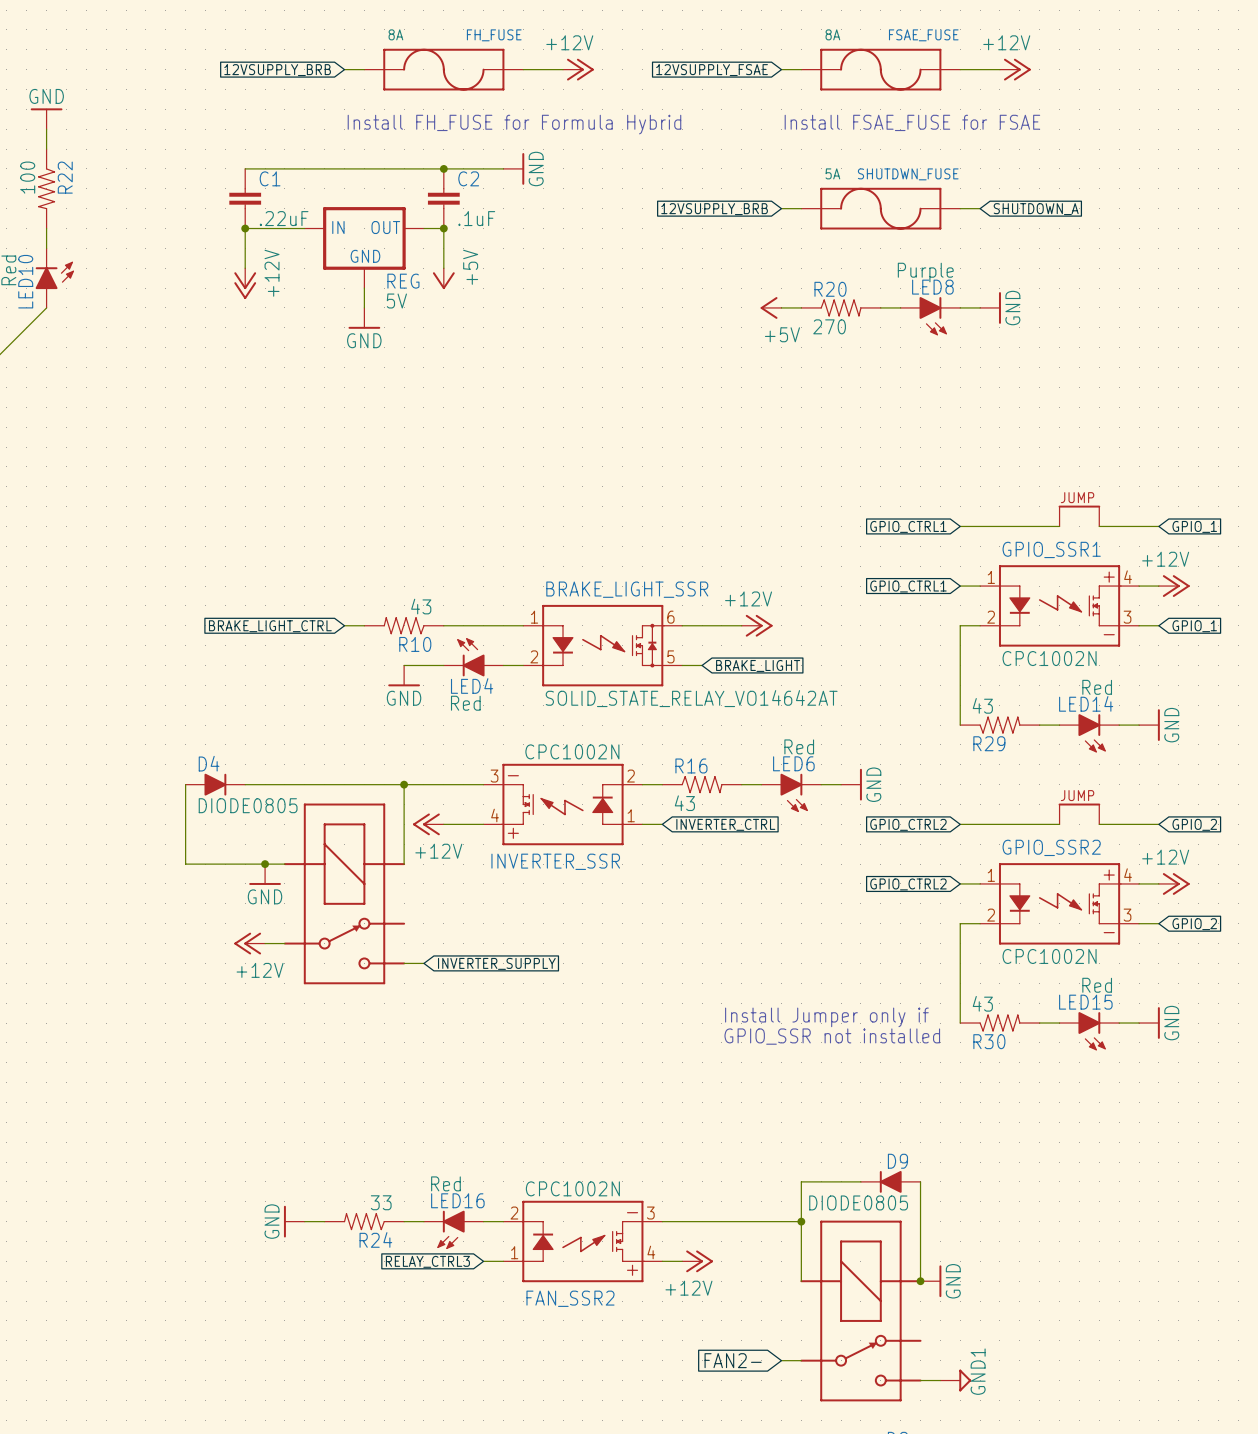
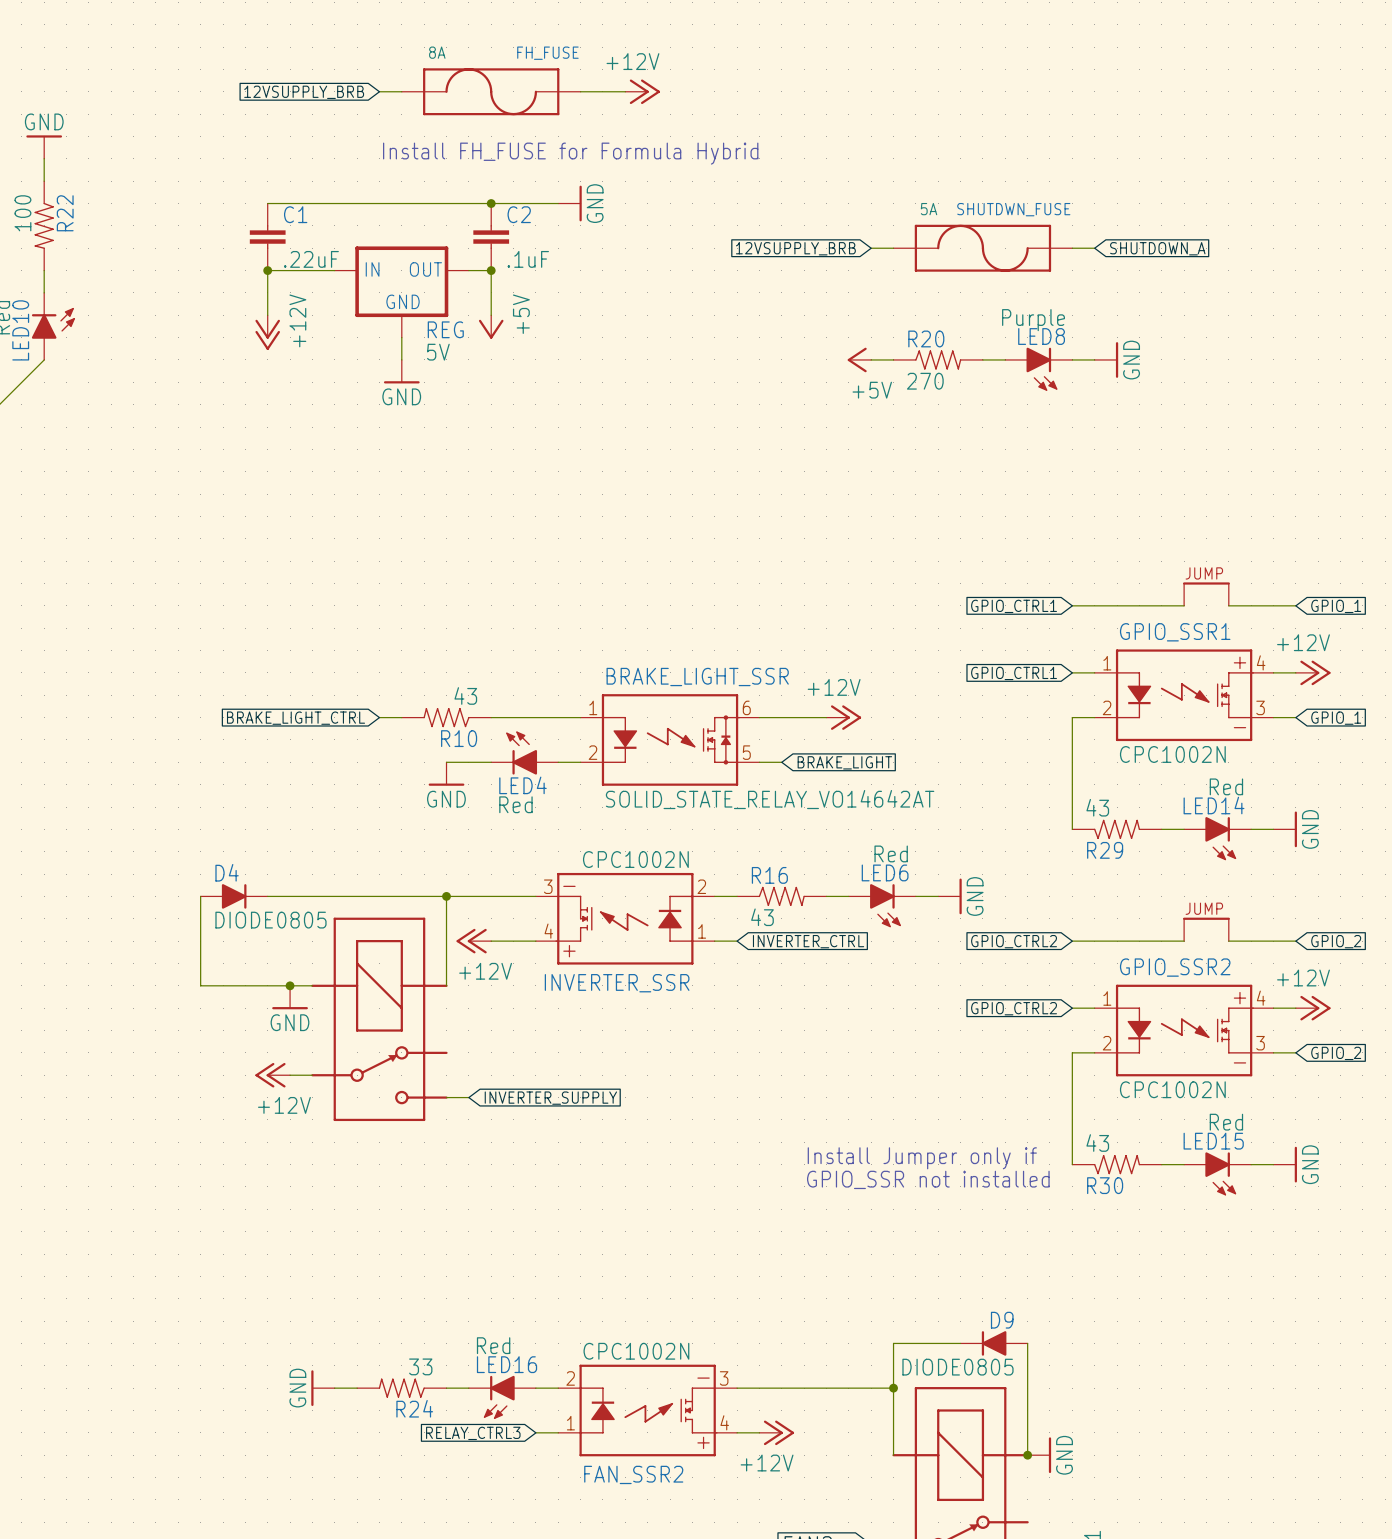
wire: (781, 69) (801, 69) -> none
FSAE_FUSE: 8A (880, 69) -> none
wire: (960, 69) (999, 69) -> none
power symbol: +12V (1015, 69) -> none
global label: 12VSUPPLY_FSAE (712, 70) -> none
text: Install FSAE_FUSE for FSAE (912, 122) -> none

